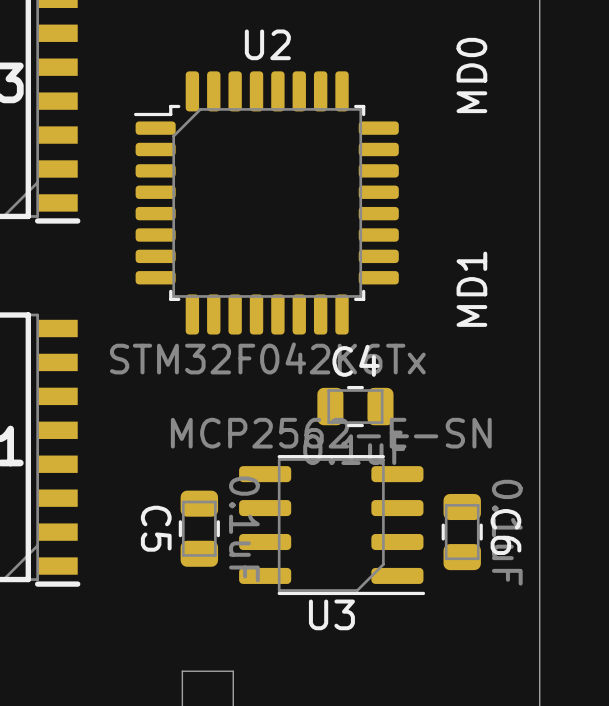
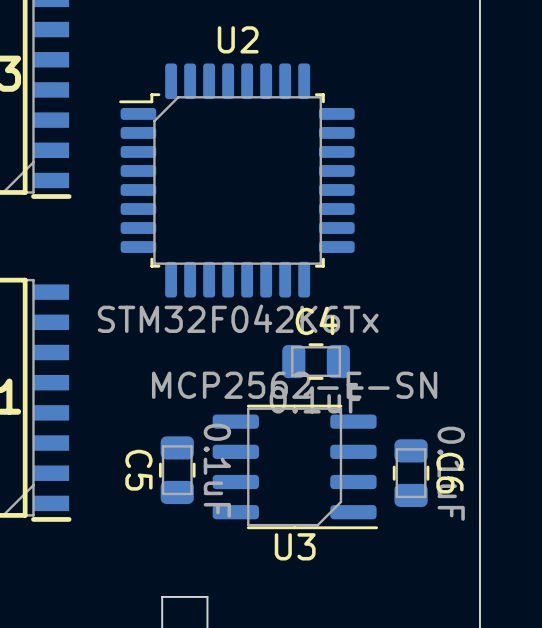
text: MD0 (471, 75) -> none
text: MD1 (471, 289) -> none

